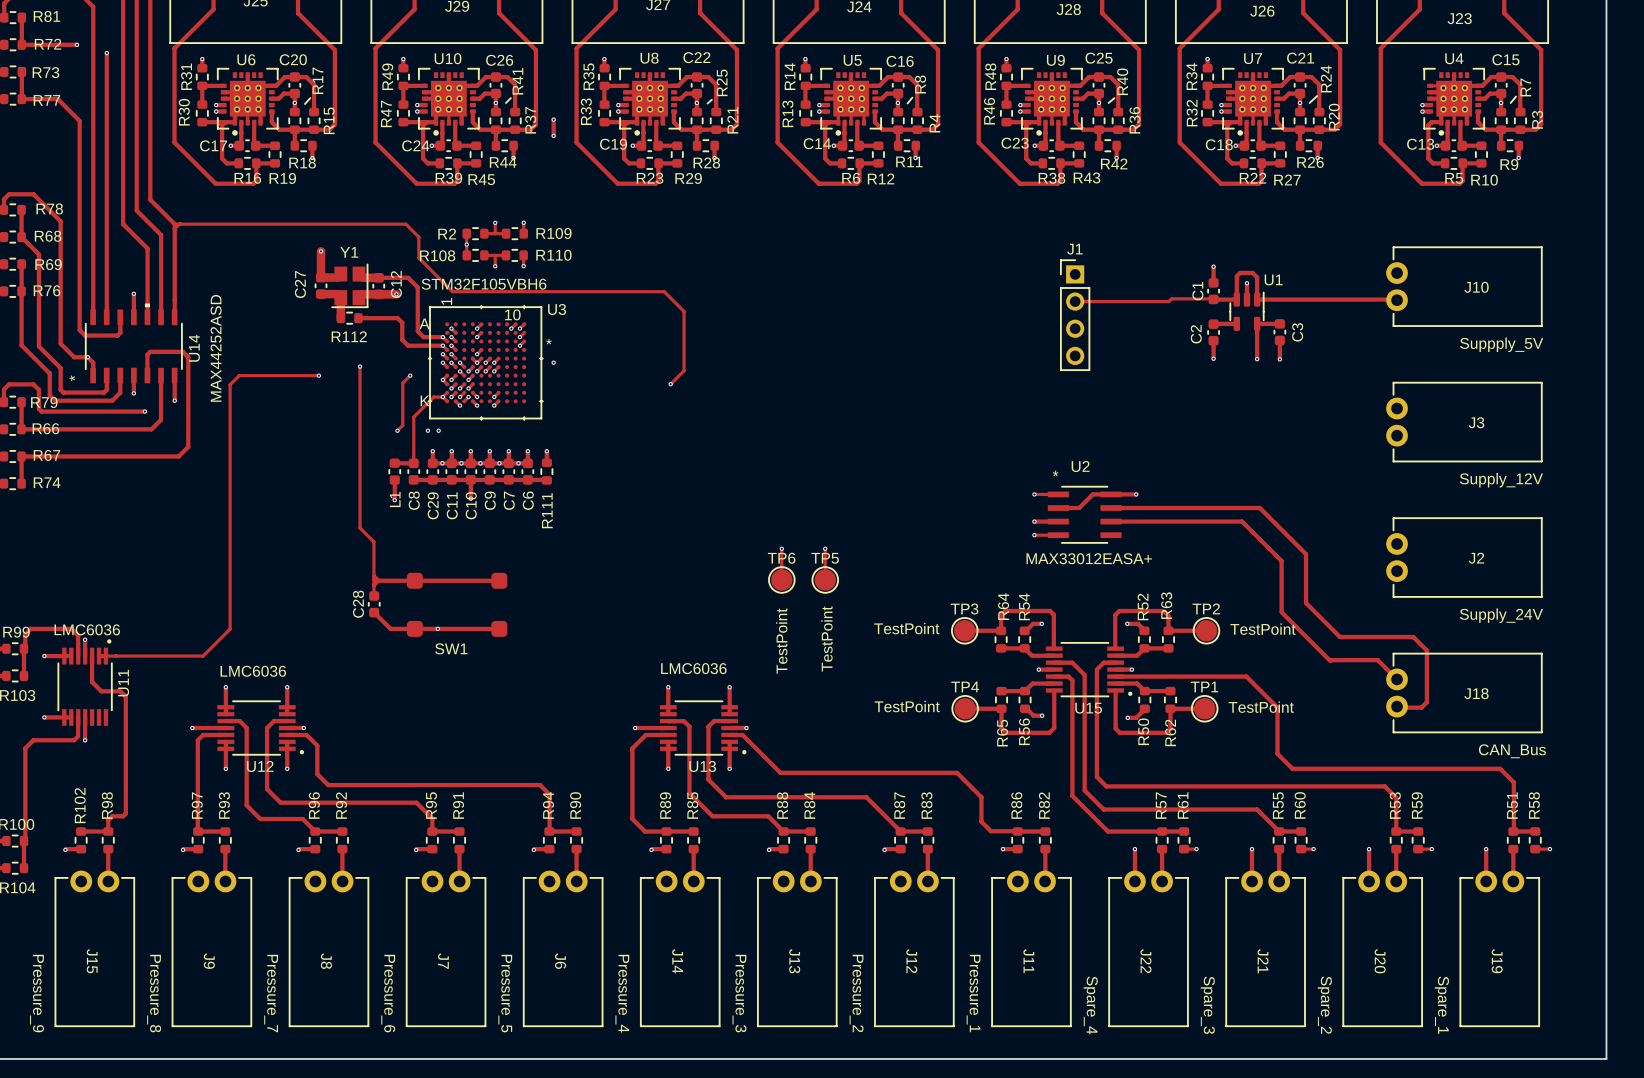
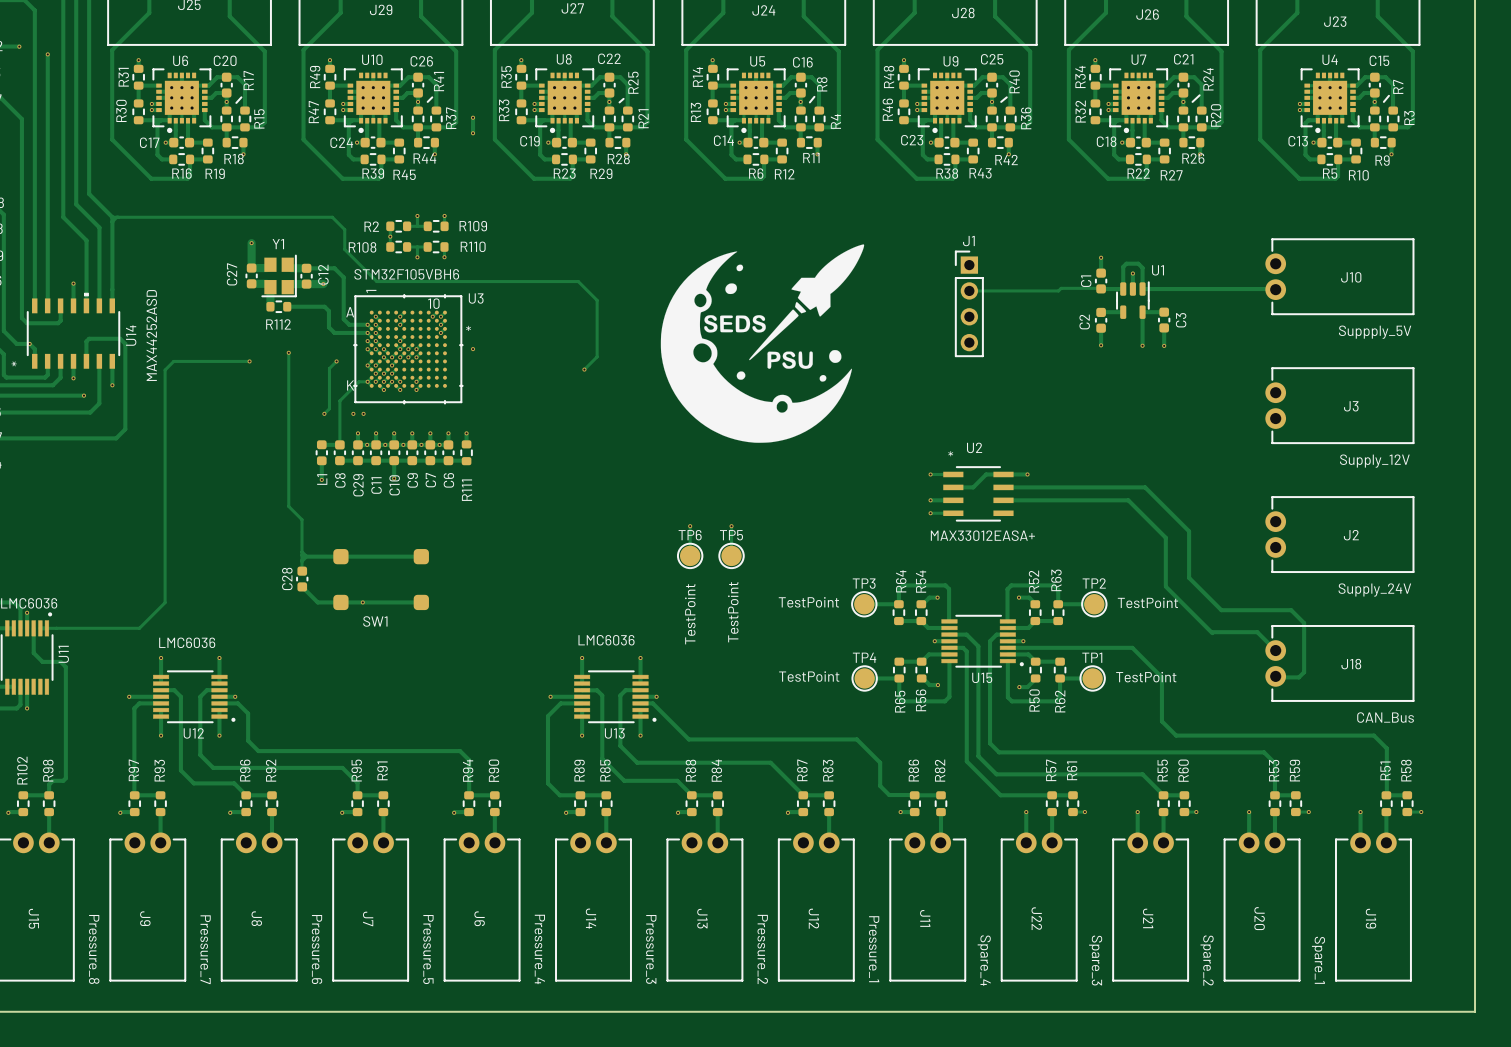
drawing: none -> [660, 244, 865, 443]

